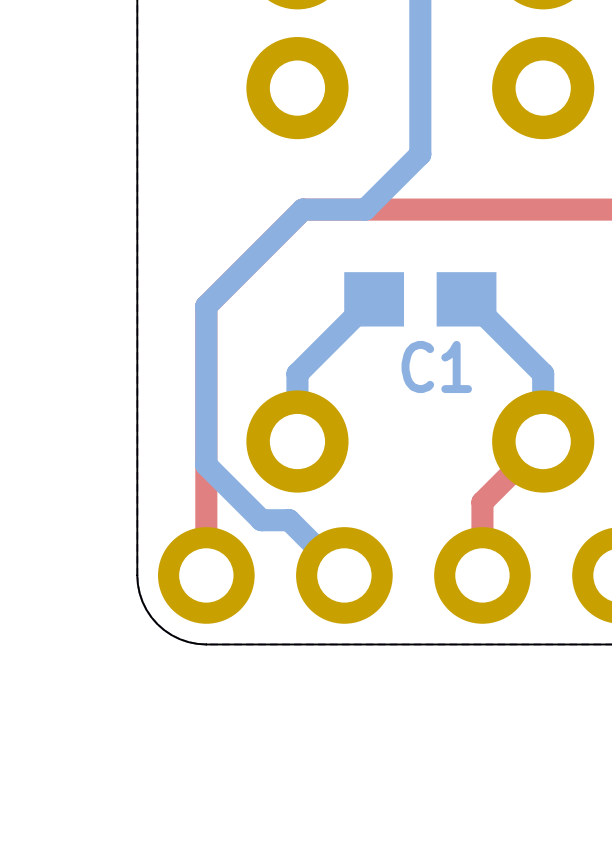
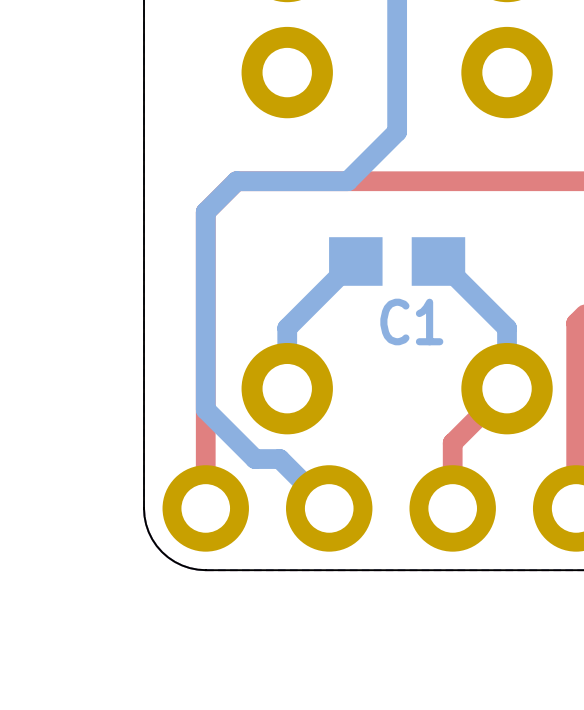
bottom track: (302, 209) (206, 306) -> (292, 181) (236, 181) (205, 212) (205, 267)

